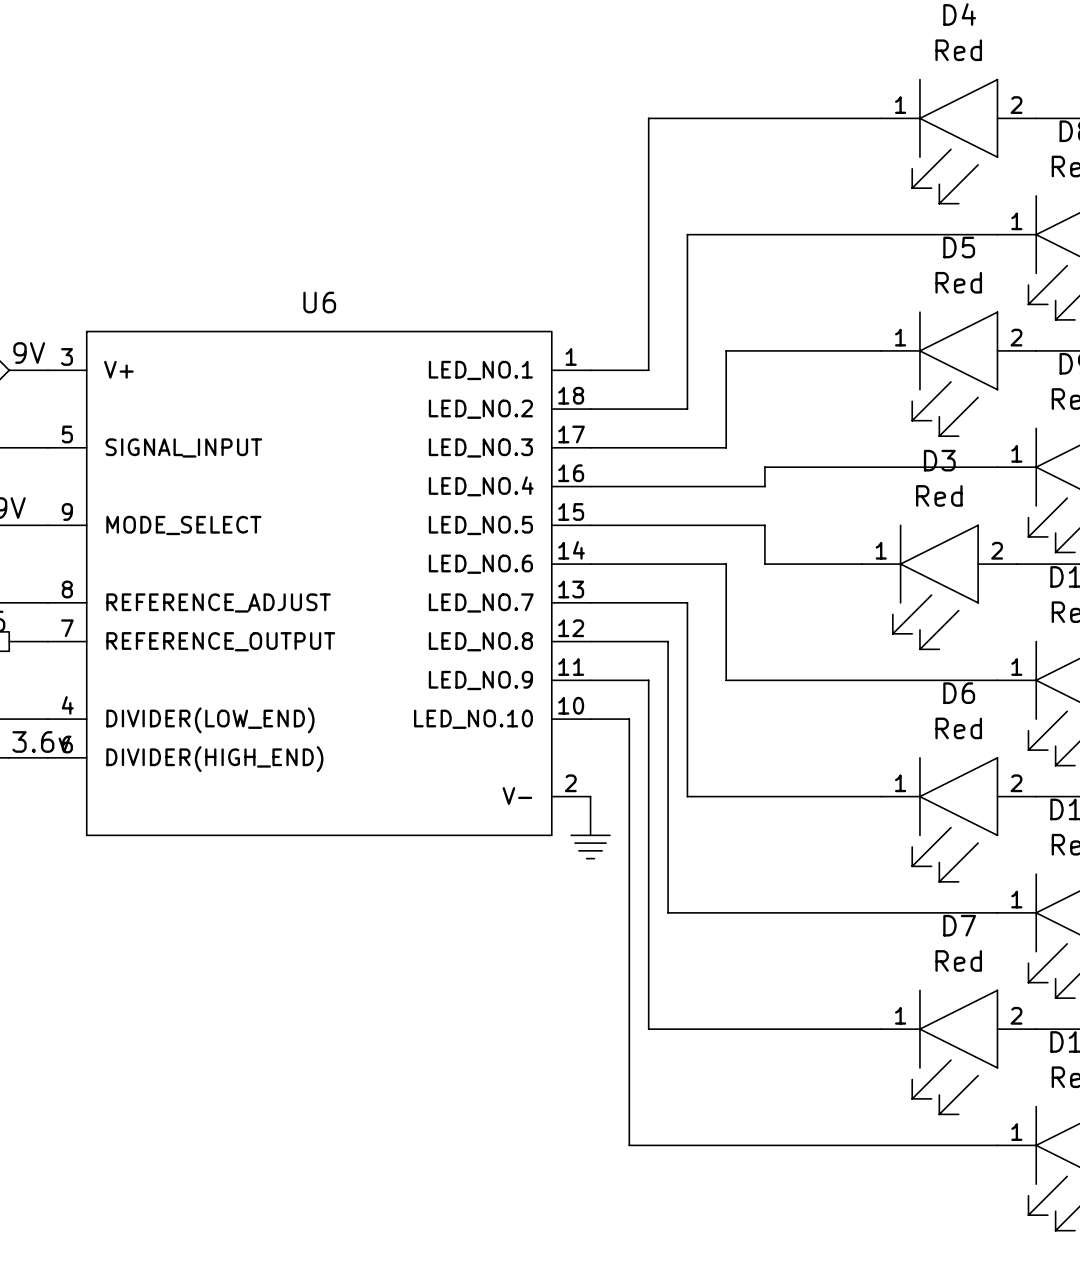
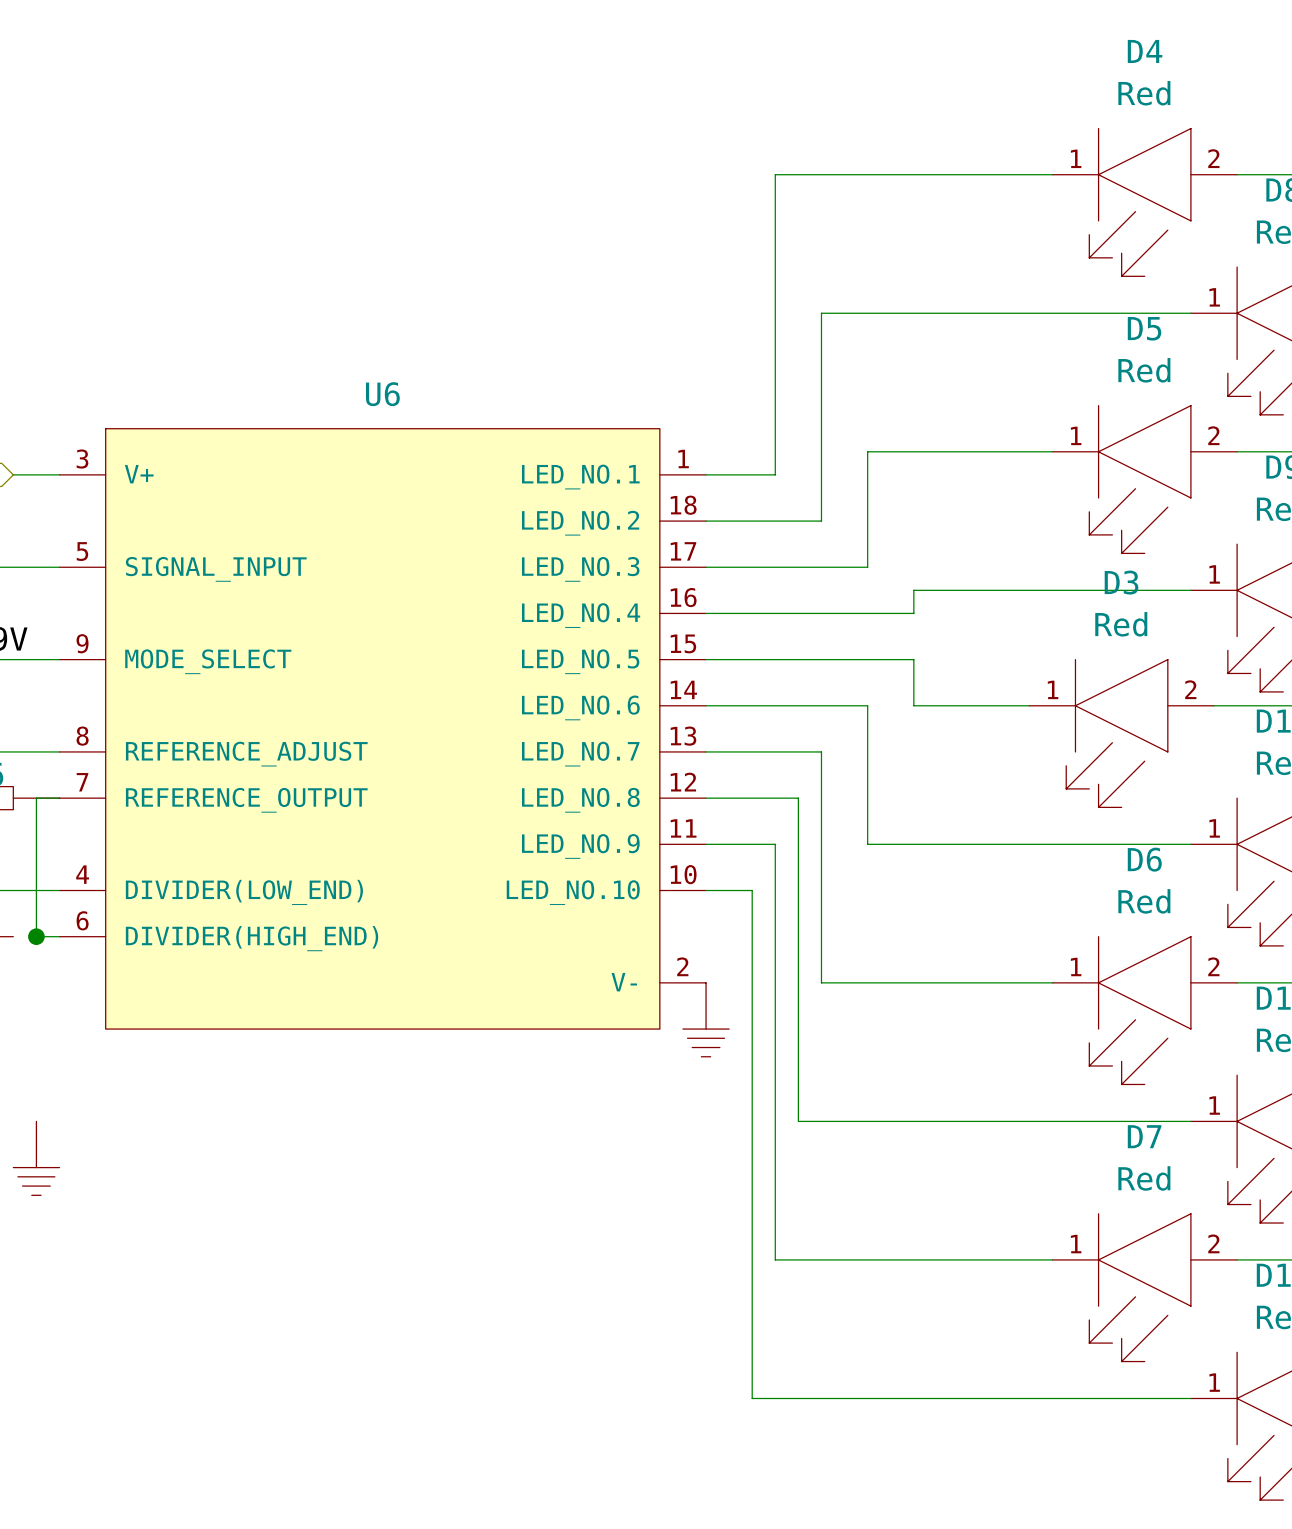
label: 9V (29, 353) -> none
text: 3.6v (41, 741) -> none
wire: (9, 757) (28, 757) -> (59, 798) (36, 798) (36, 936)
junction: none -> (36, 936)
power symbol: none -> (36, 1158)

